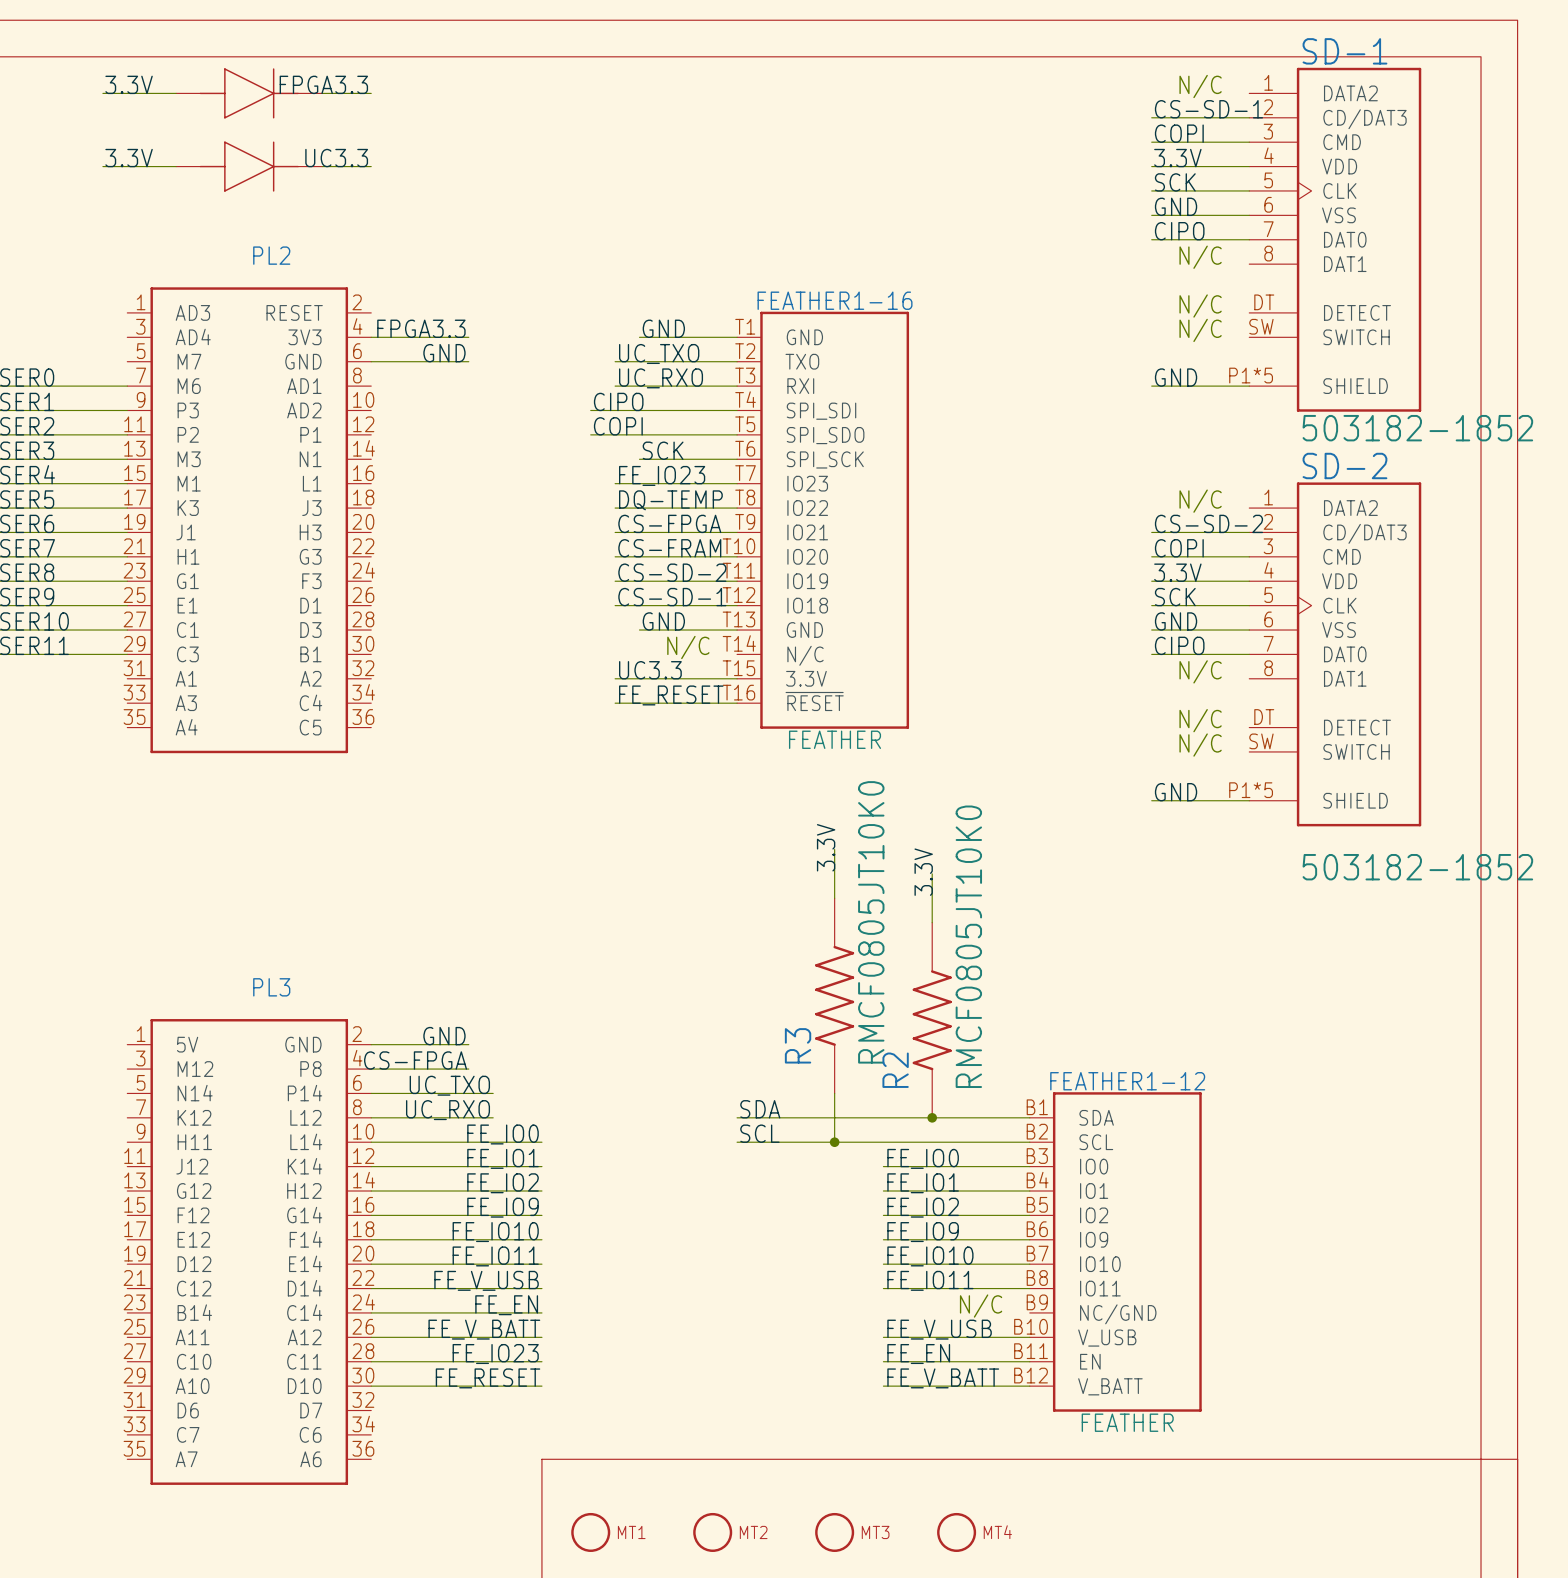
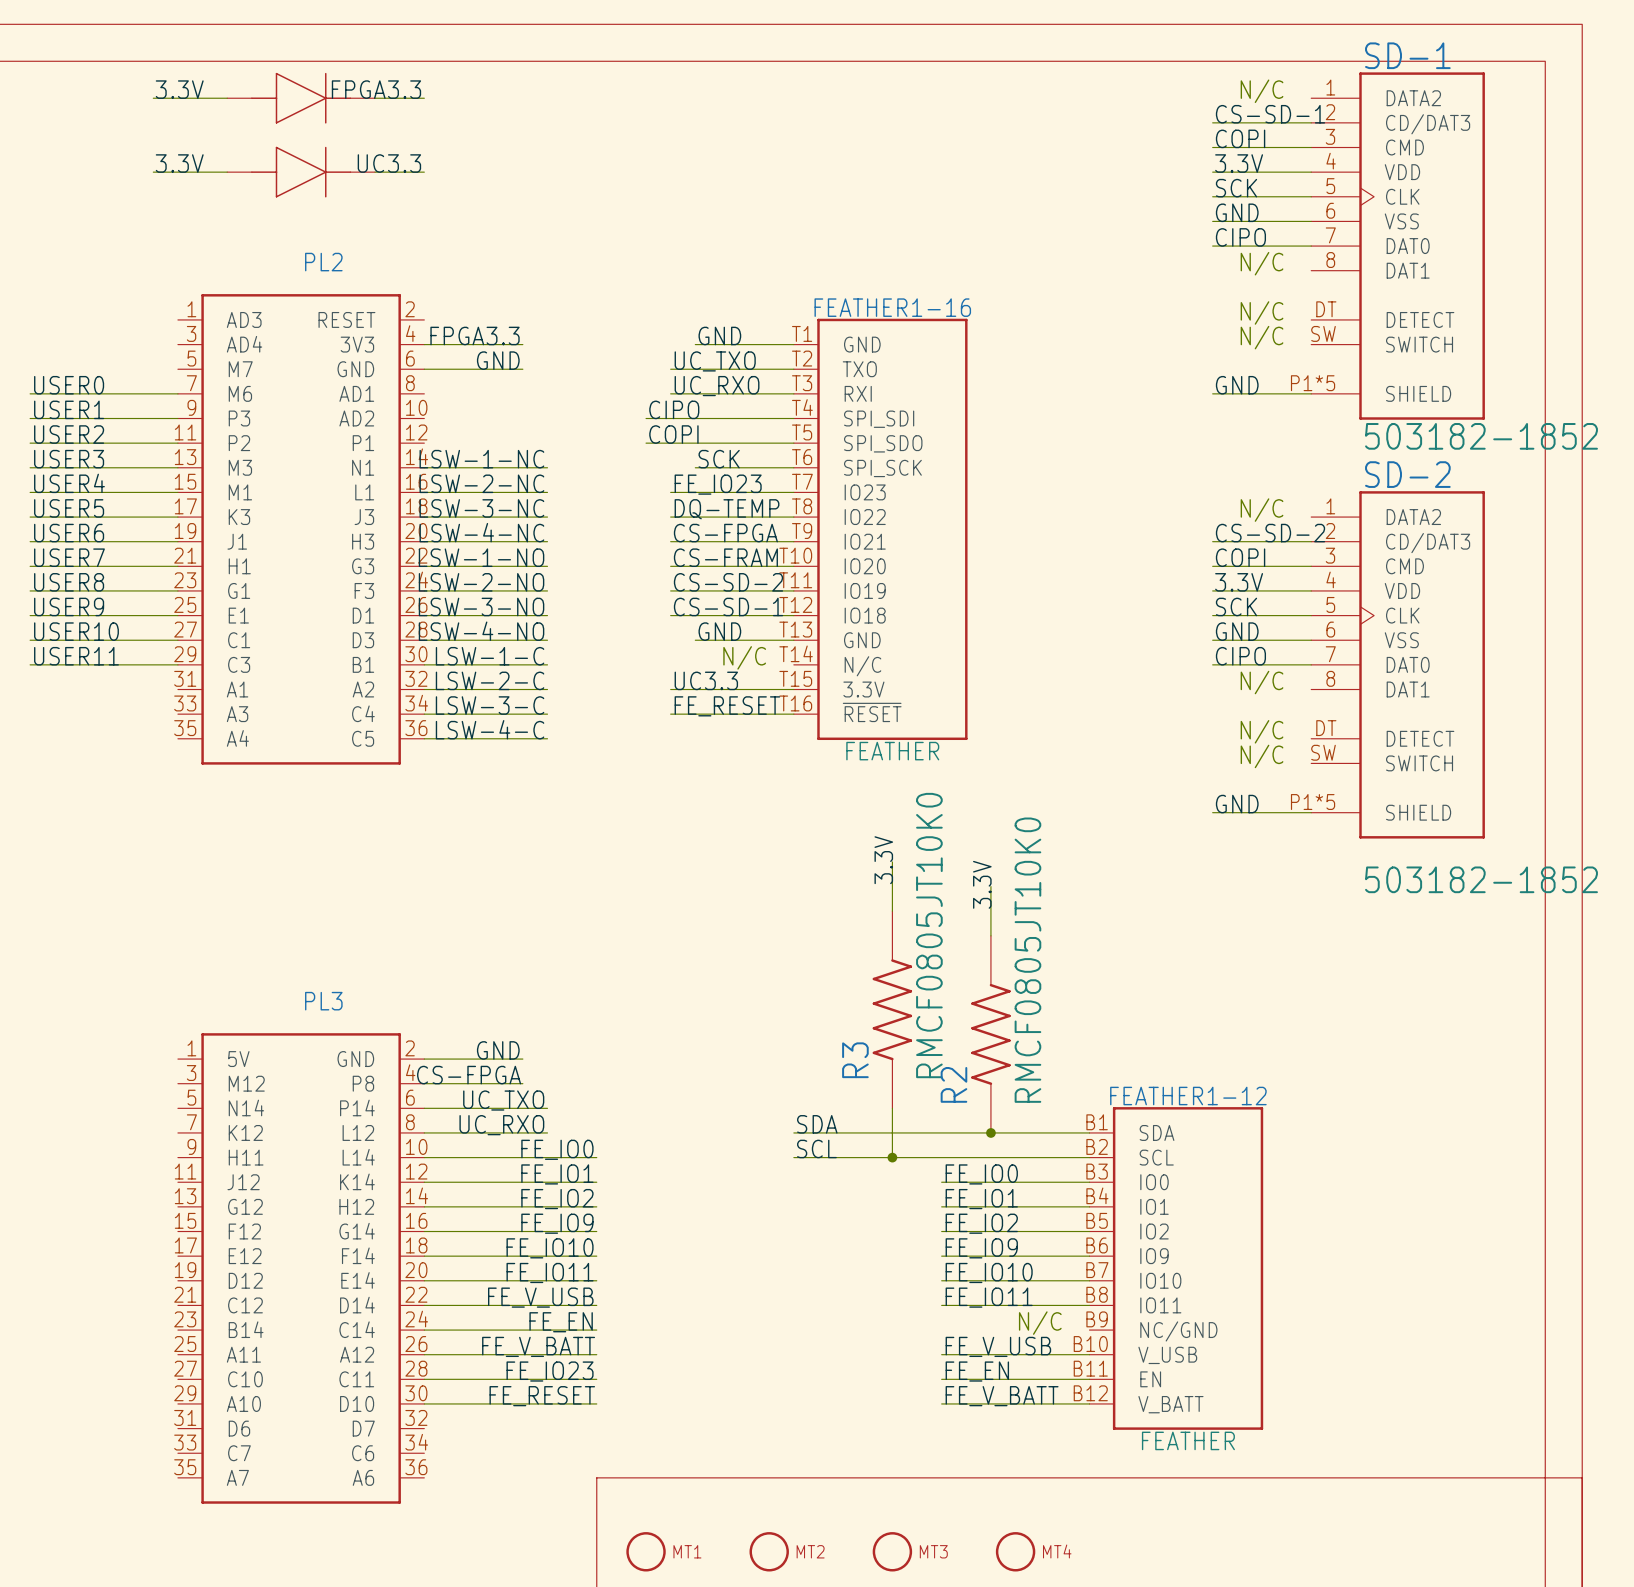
label: none -> LSW-1-NC (481, 459)
wire: none -> (424, 467) (547, 467)
label: none -> LSW-2-NC (481, 483)
wire: none -> (424, 492) (547, 492)
label: none -> LSW-3-NC (481, 508)
wire: none -> (424, 517) (547, 517)
label: none -> LSW-4-NC (481, 532)
wire: none -> (424, 541) (547, 541)
label: none -> LSW-1-NO (481, 557)
wire: none -> (424, 566) (547, 566)
label: none -> LSW-2-NO (481, 582)
wire: none -> (424, 590) (547, 590)
label: none -> LSW-3-NO (481, 606)
wire: none -> (424, 615) (547, 615)
label: none -> LSW-4-NO (481, 631)
wire: none -> (424, 640) (547, 640)
label: none -> LSW-1-C (490, 656)
wire: none -> (424, 664) (547, 664)
label: none -> LSW-2-C (490, 680)
wire: none -> (424, 689) (547, 689)
label: none -> LSW-3-C (490, 705)
wire: none -> (424, 714) (547, 714)
label: none -> LSW-4-C (490, 729)
wire: none -> (424, 738) (547, 738)

